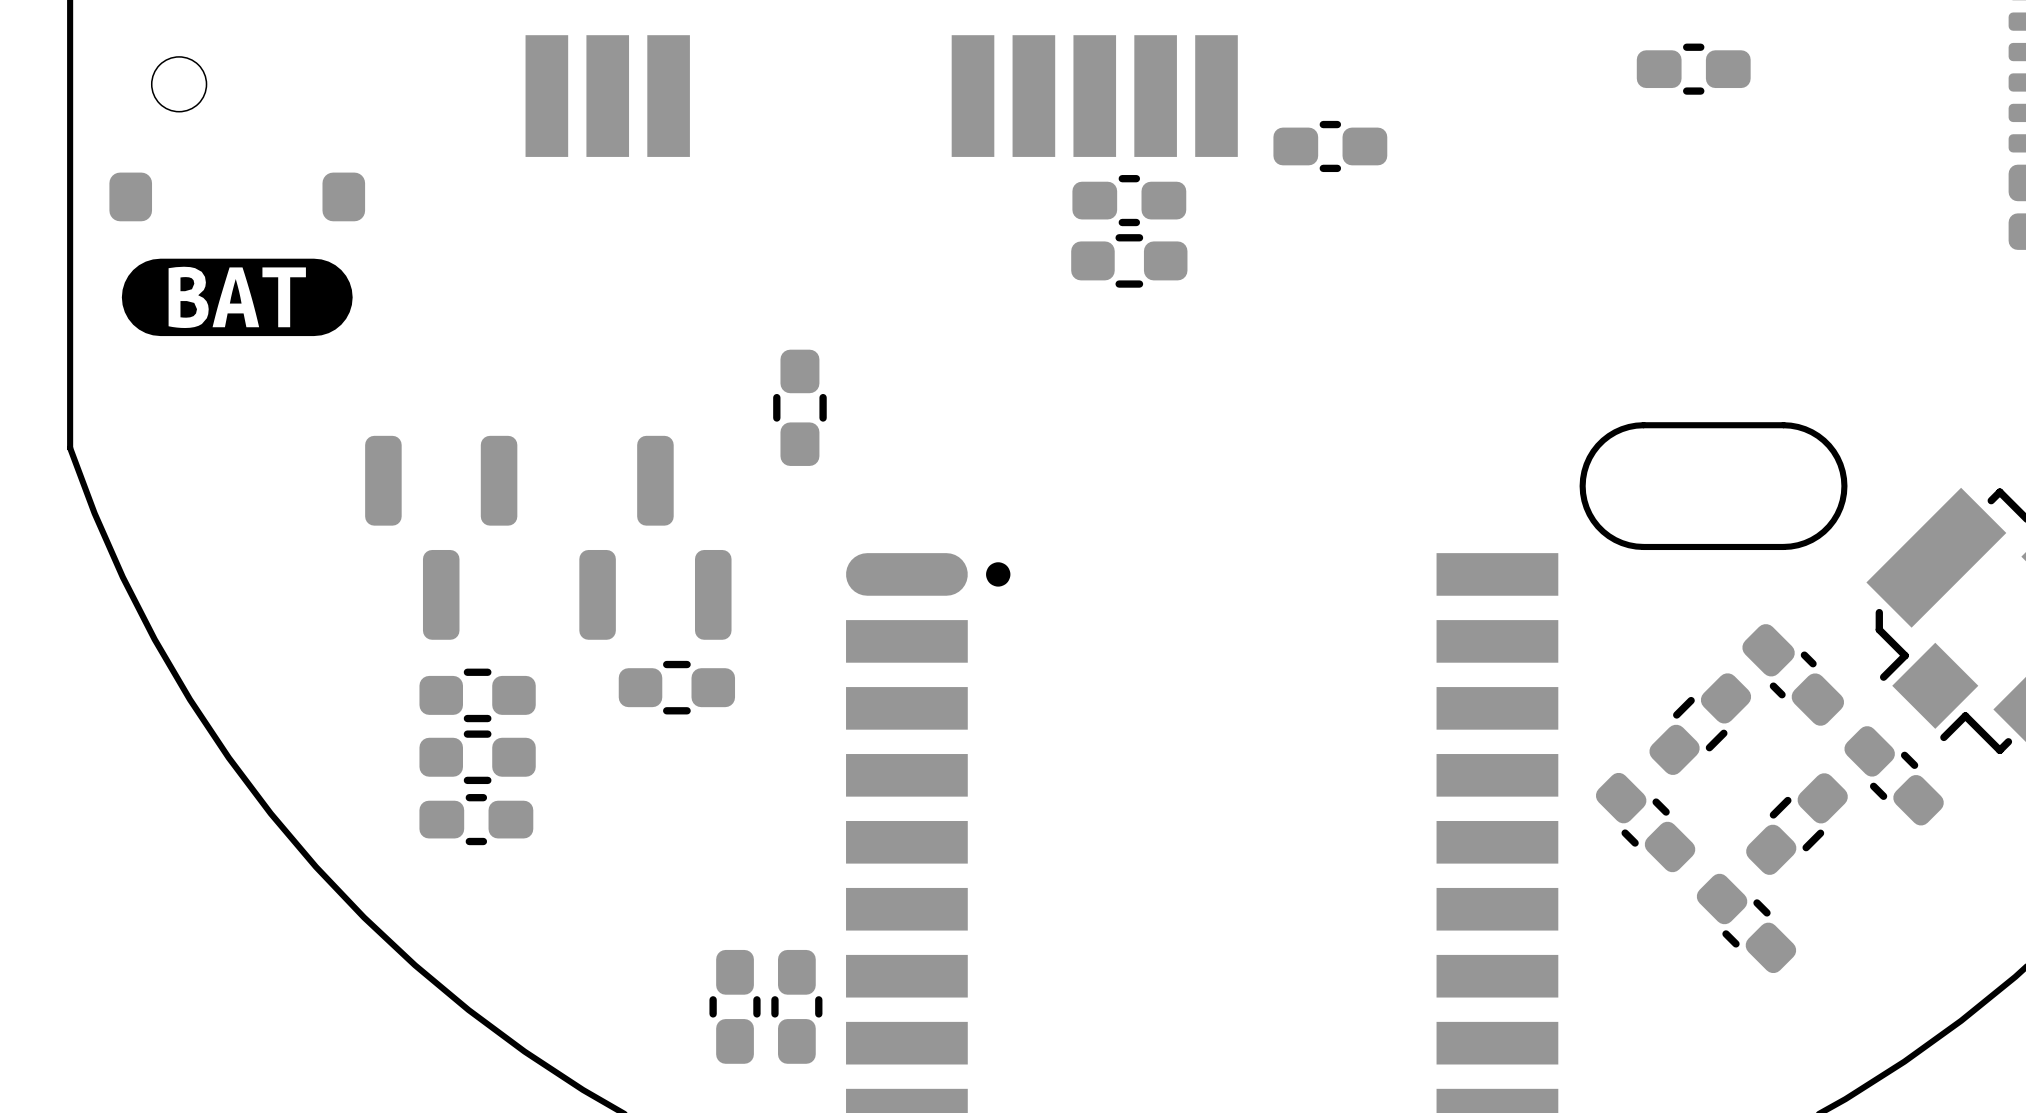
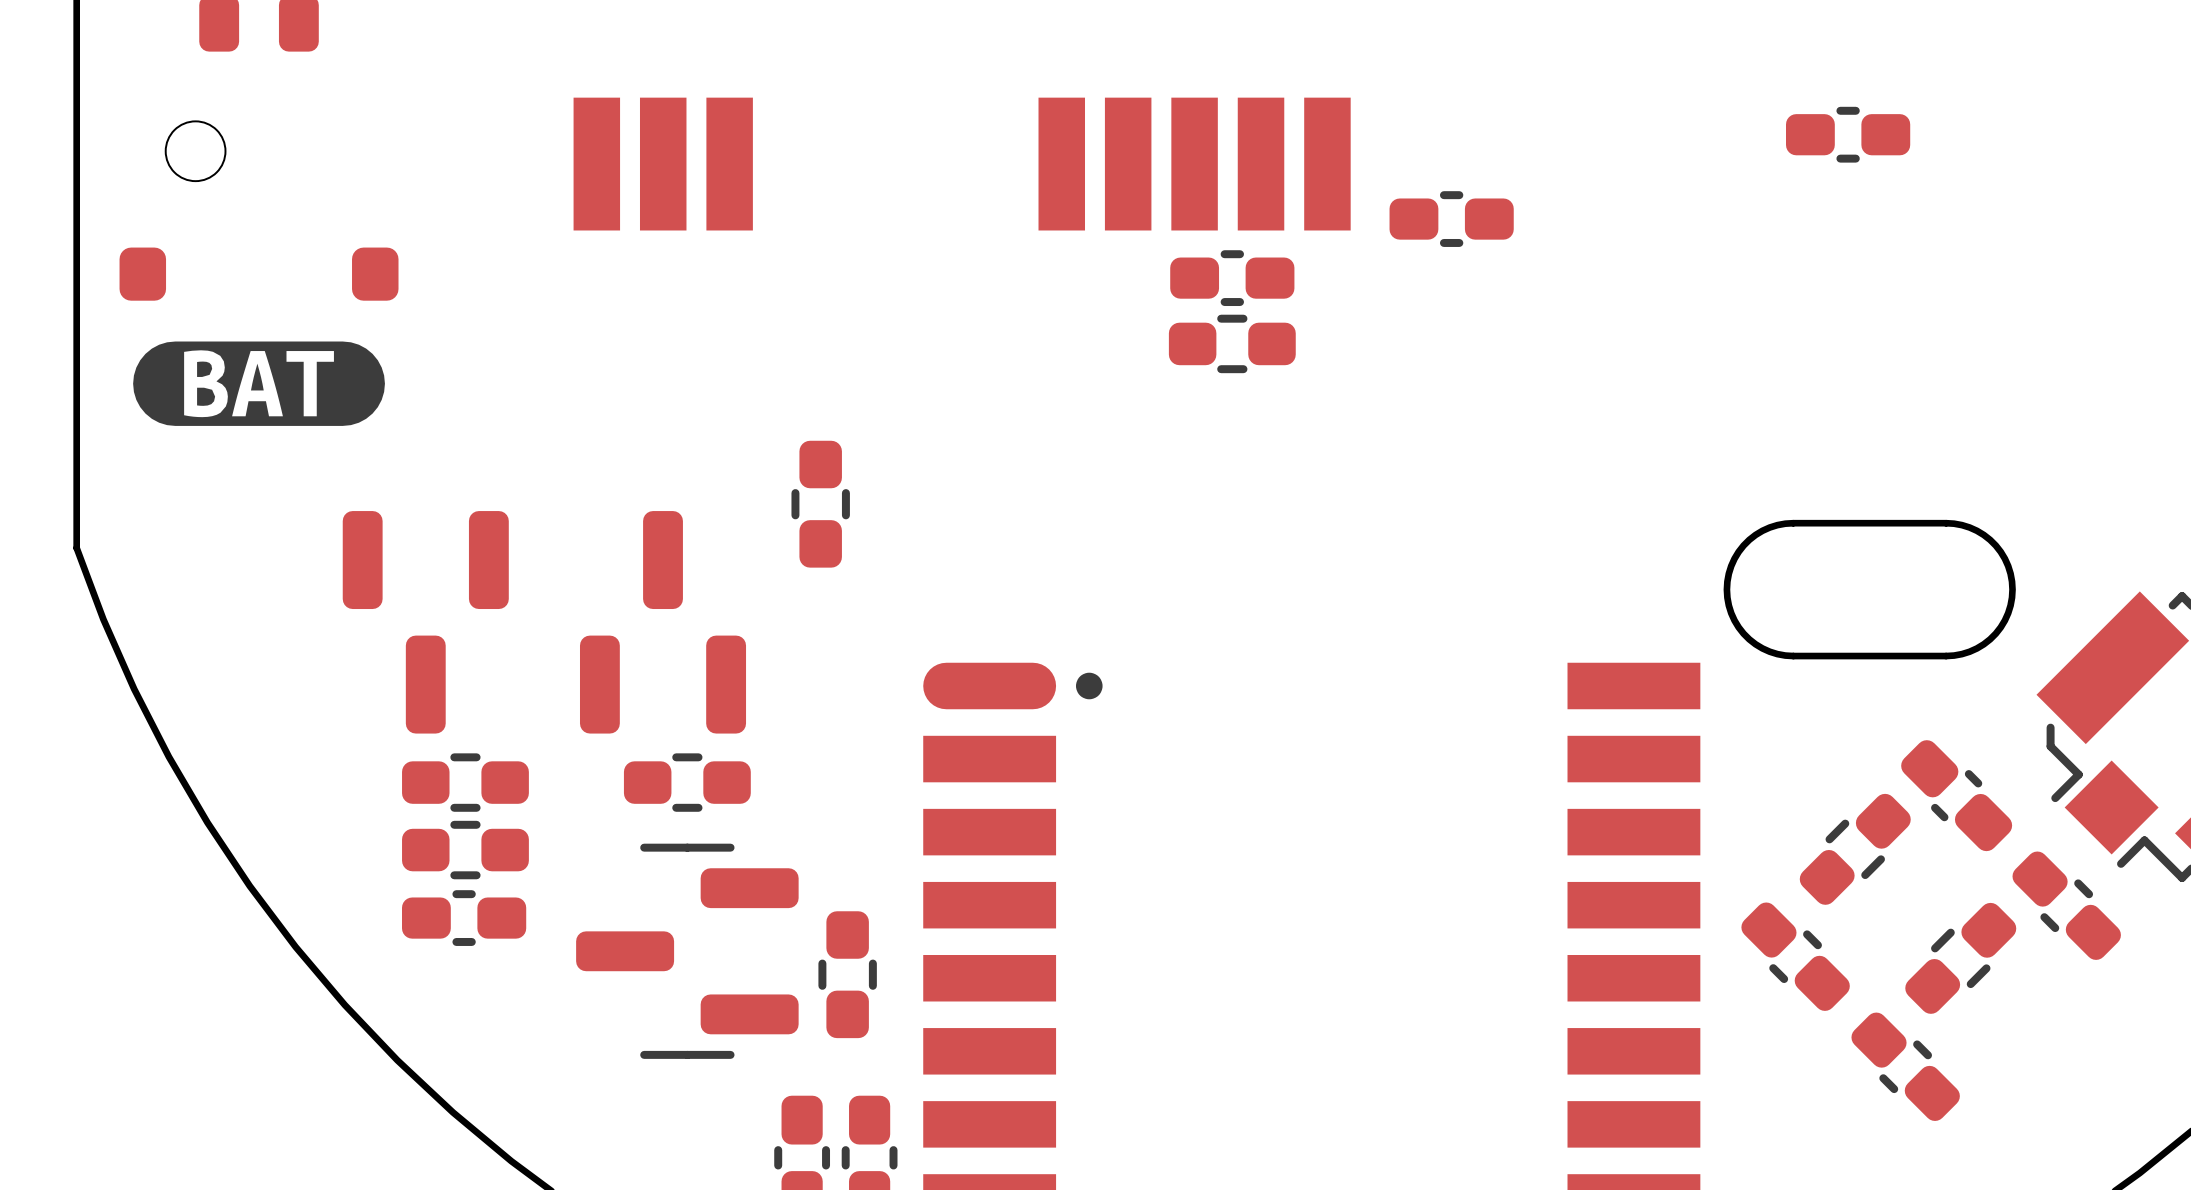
part position: (799, 407) -> (820, 504)
part position: (441, 537) -> (425, 622)
part position: (655, 537) -> (663, 622)
part: none -> (465, 782)
part position: (676, 687) -> (687, 782)
part: (477, 695) -> none
part: none -> (465, 850)
part: (477, 757) -> none
part: none -> (687, 951)
part position: (476, 819) -> (464, 918)
part: none -> (847, 974)

